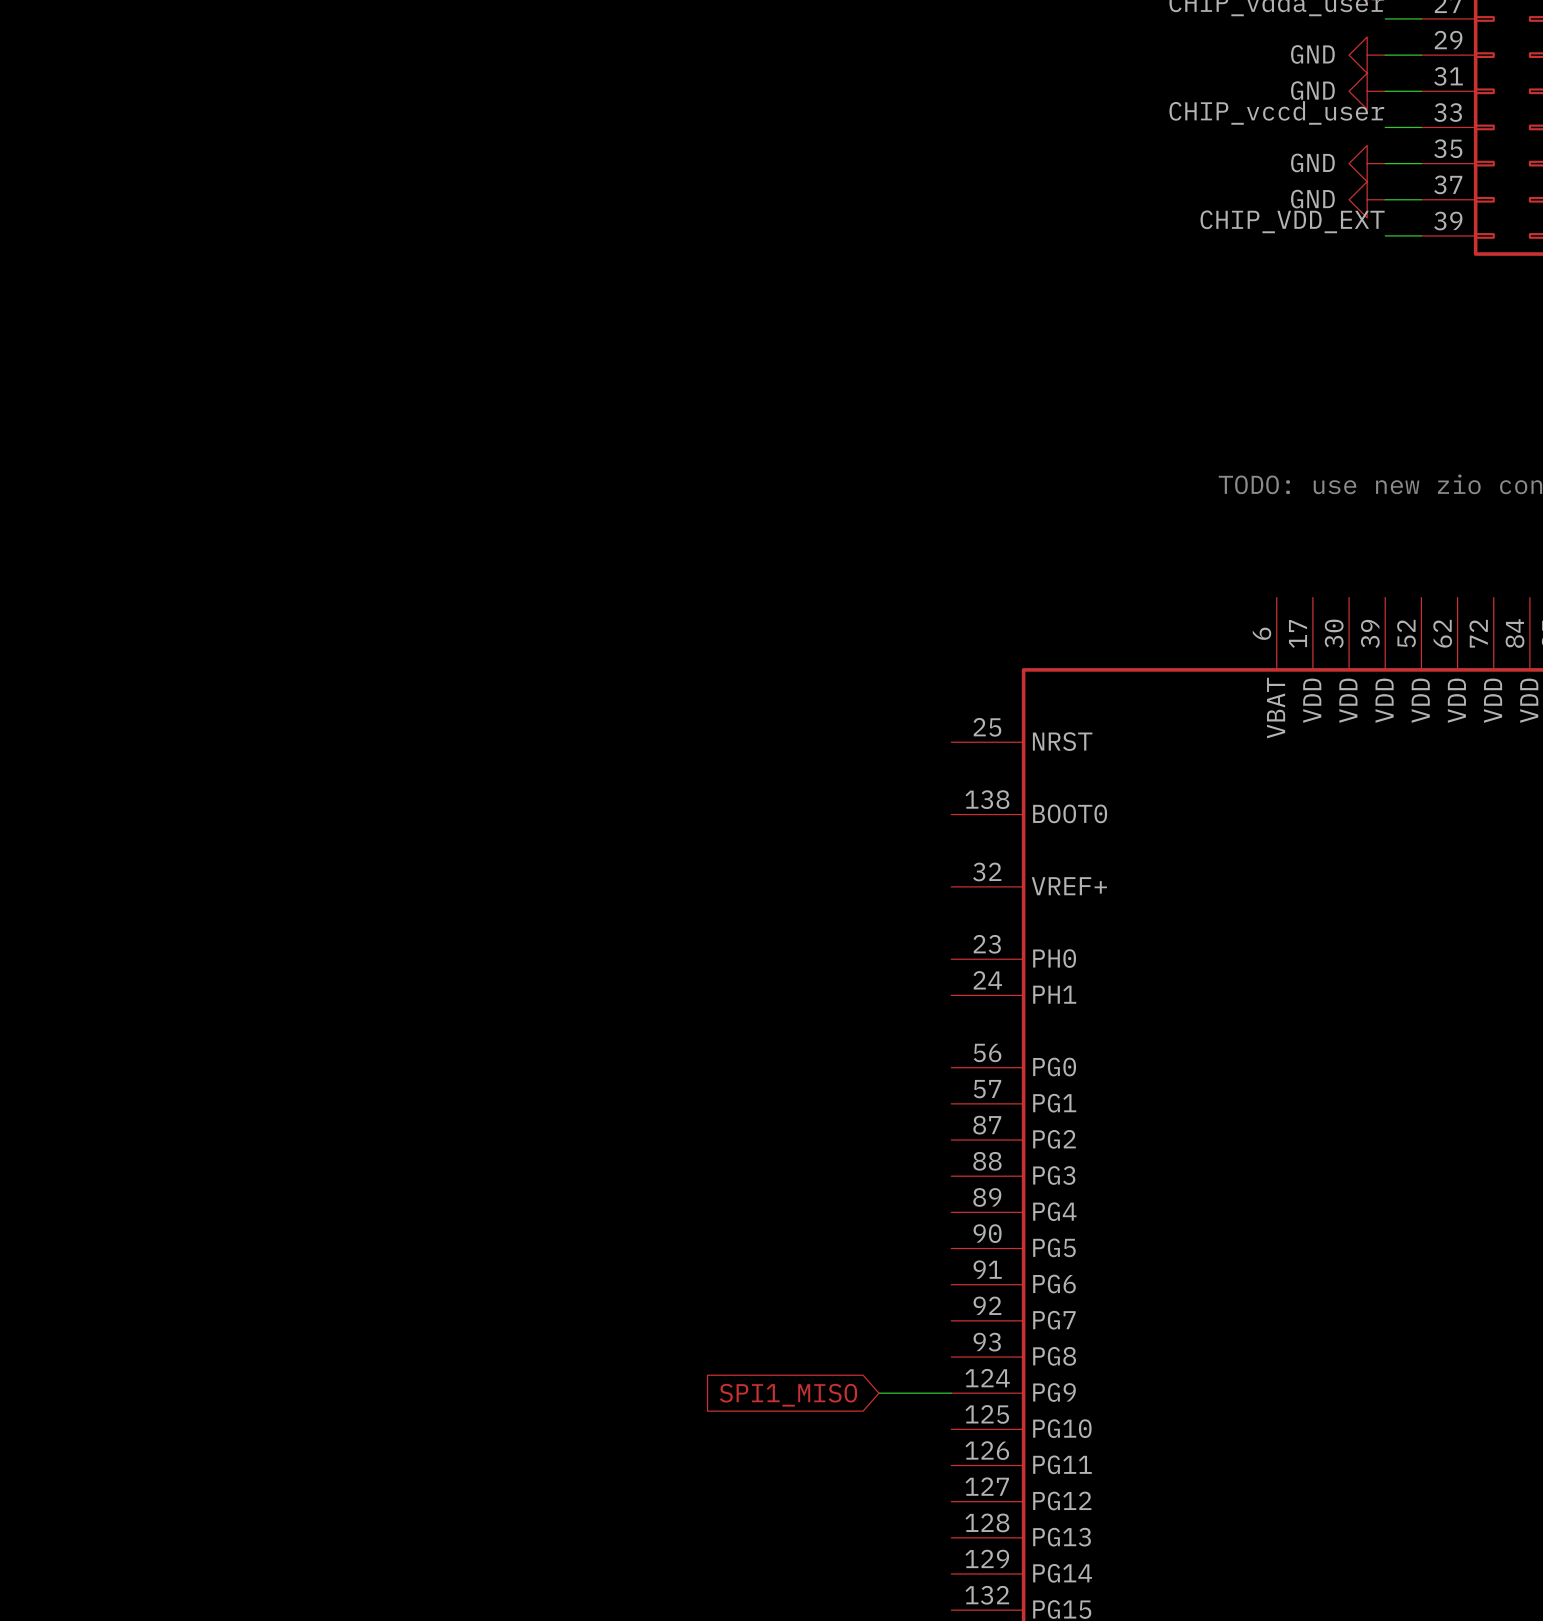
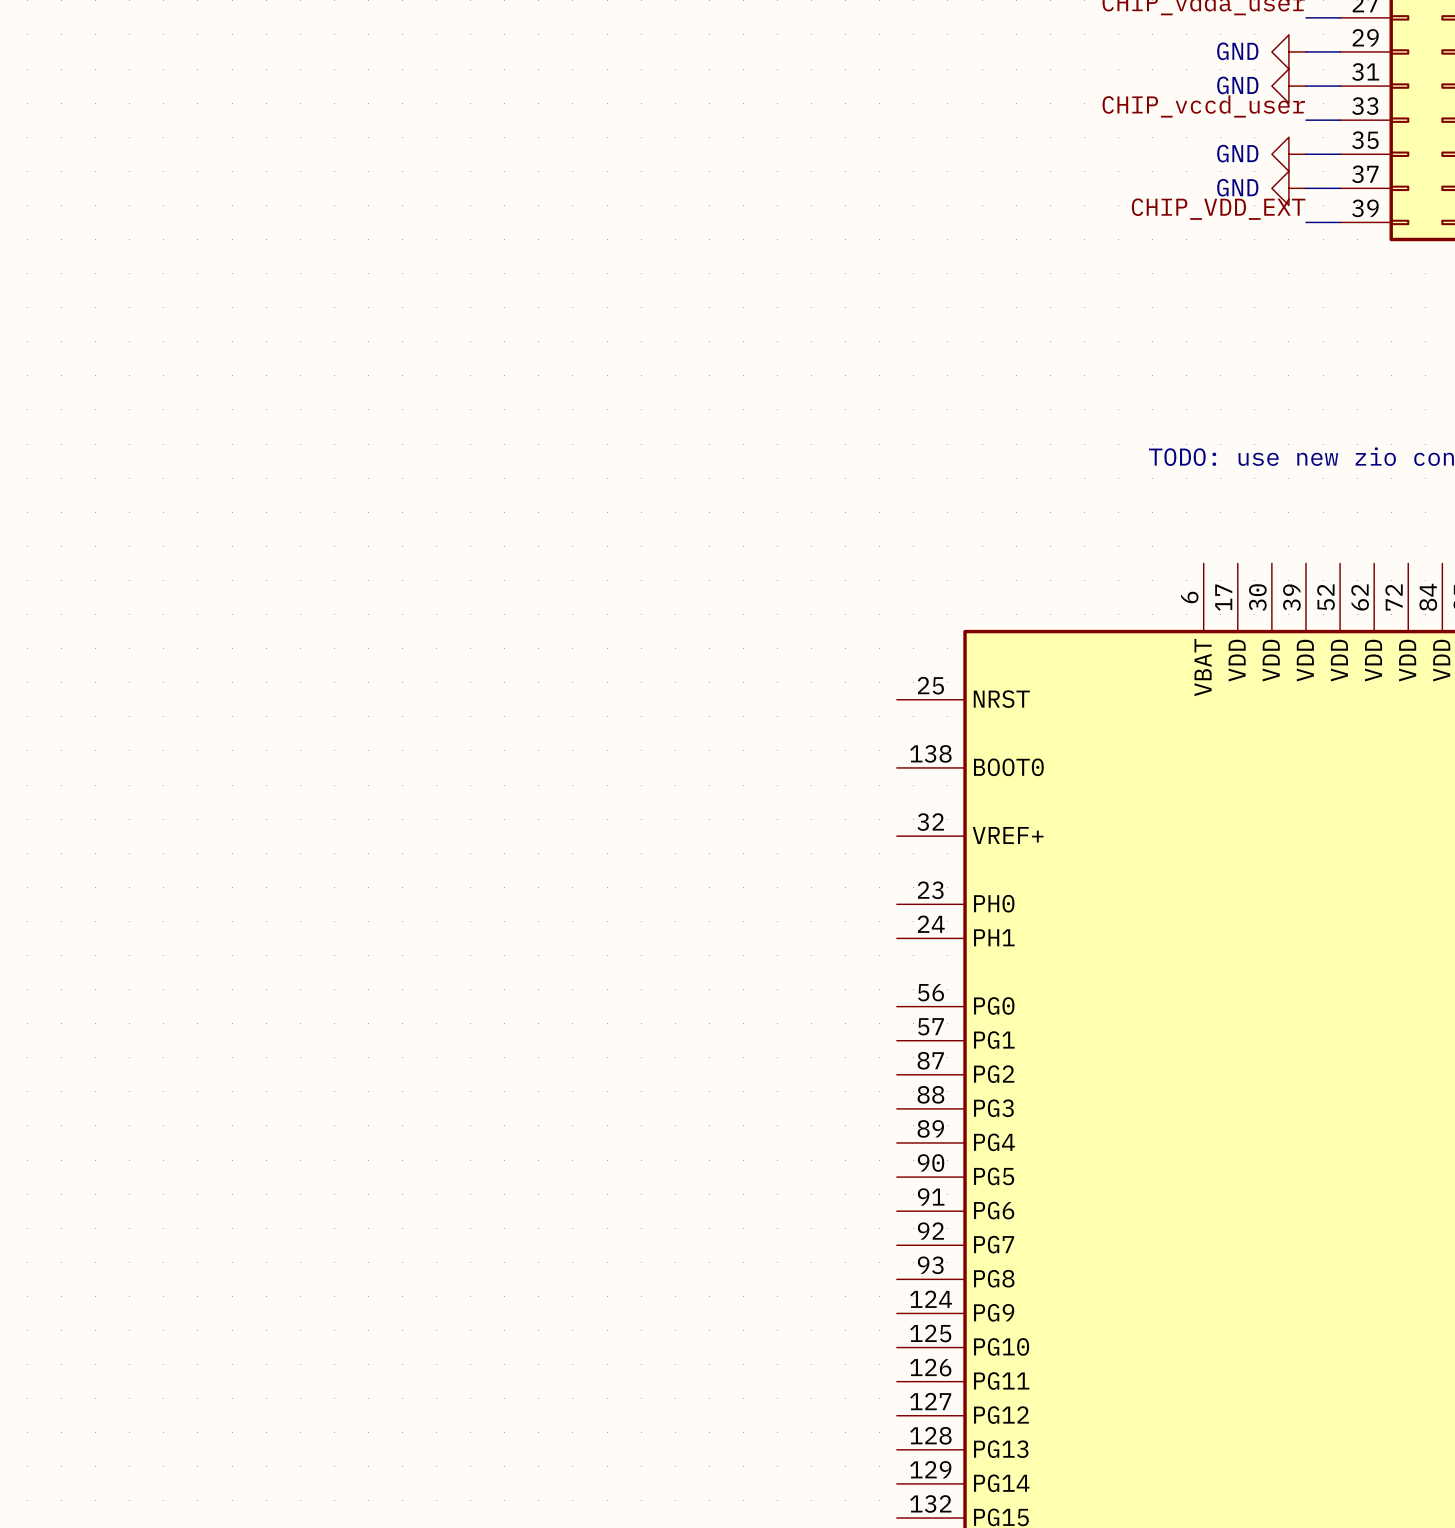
wire: (878, 1393) (951, 1393) -> none
global label: SPI1_MISO (788, 1395) -> none

